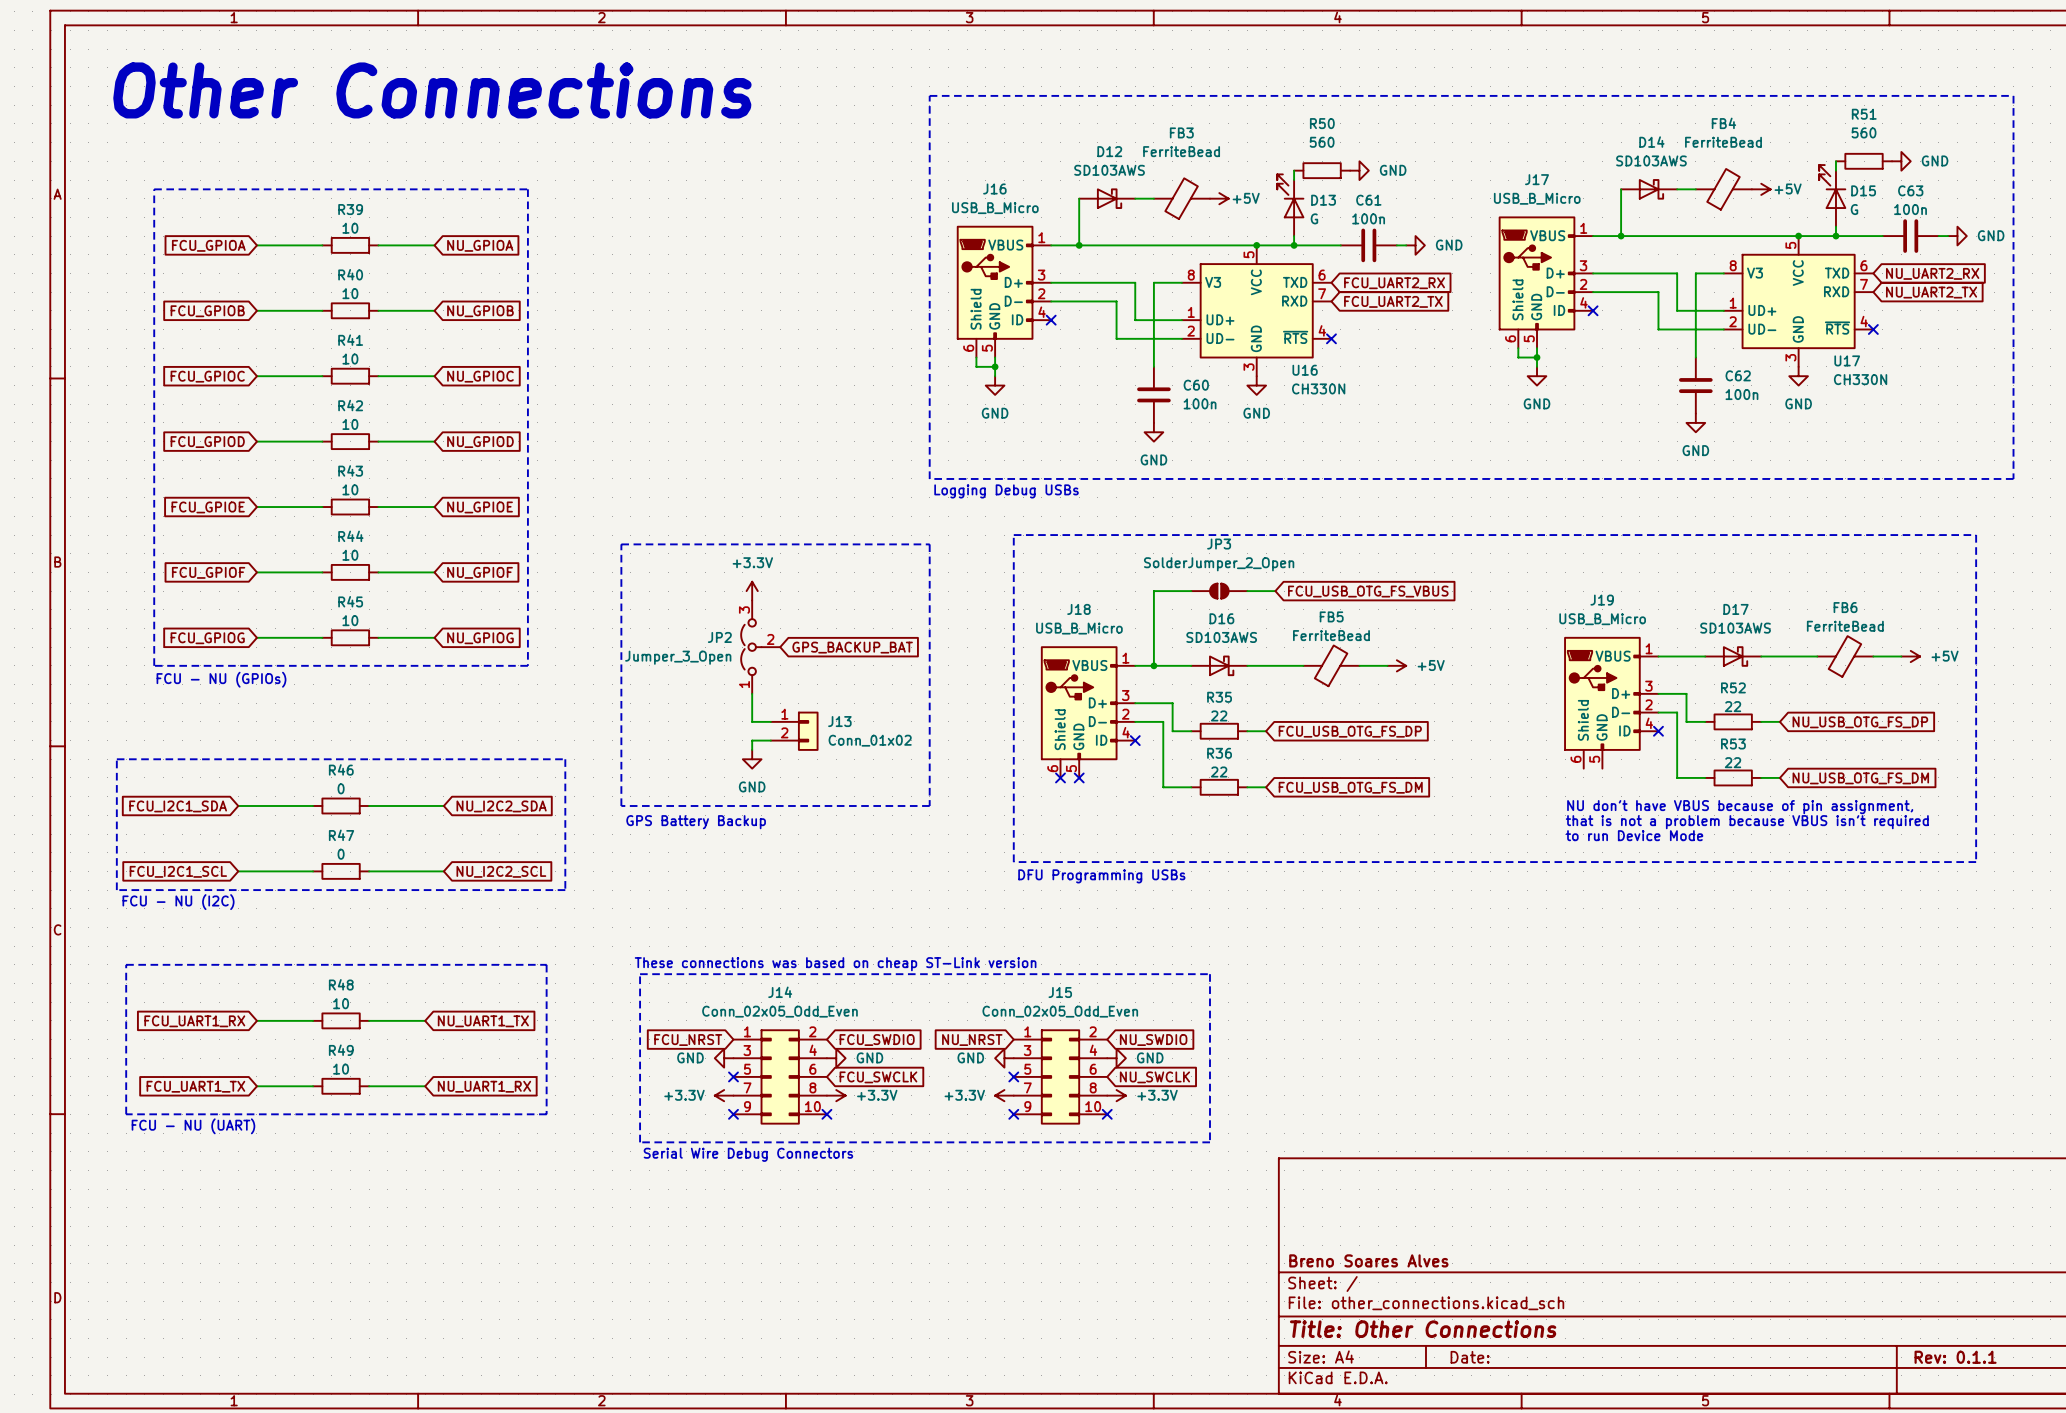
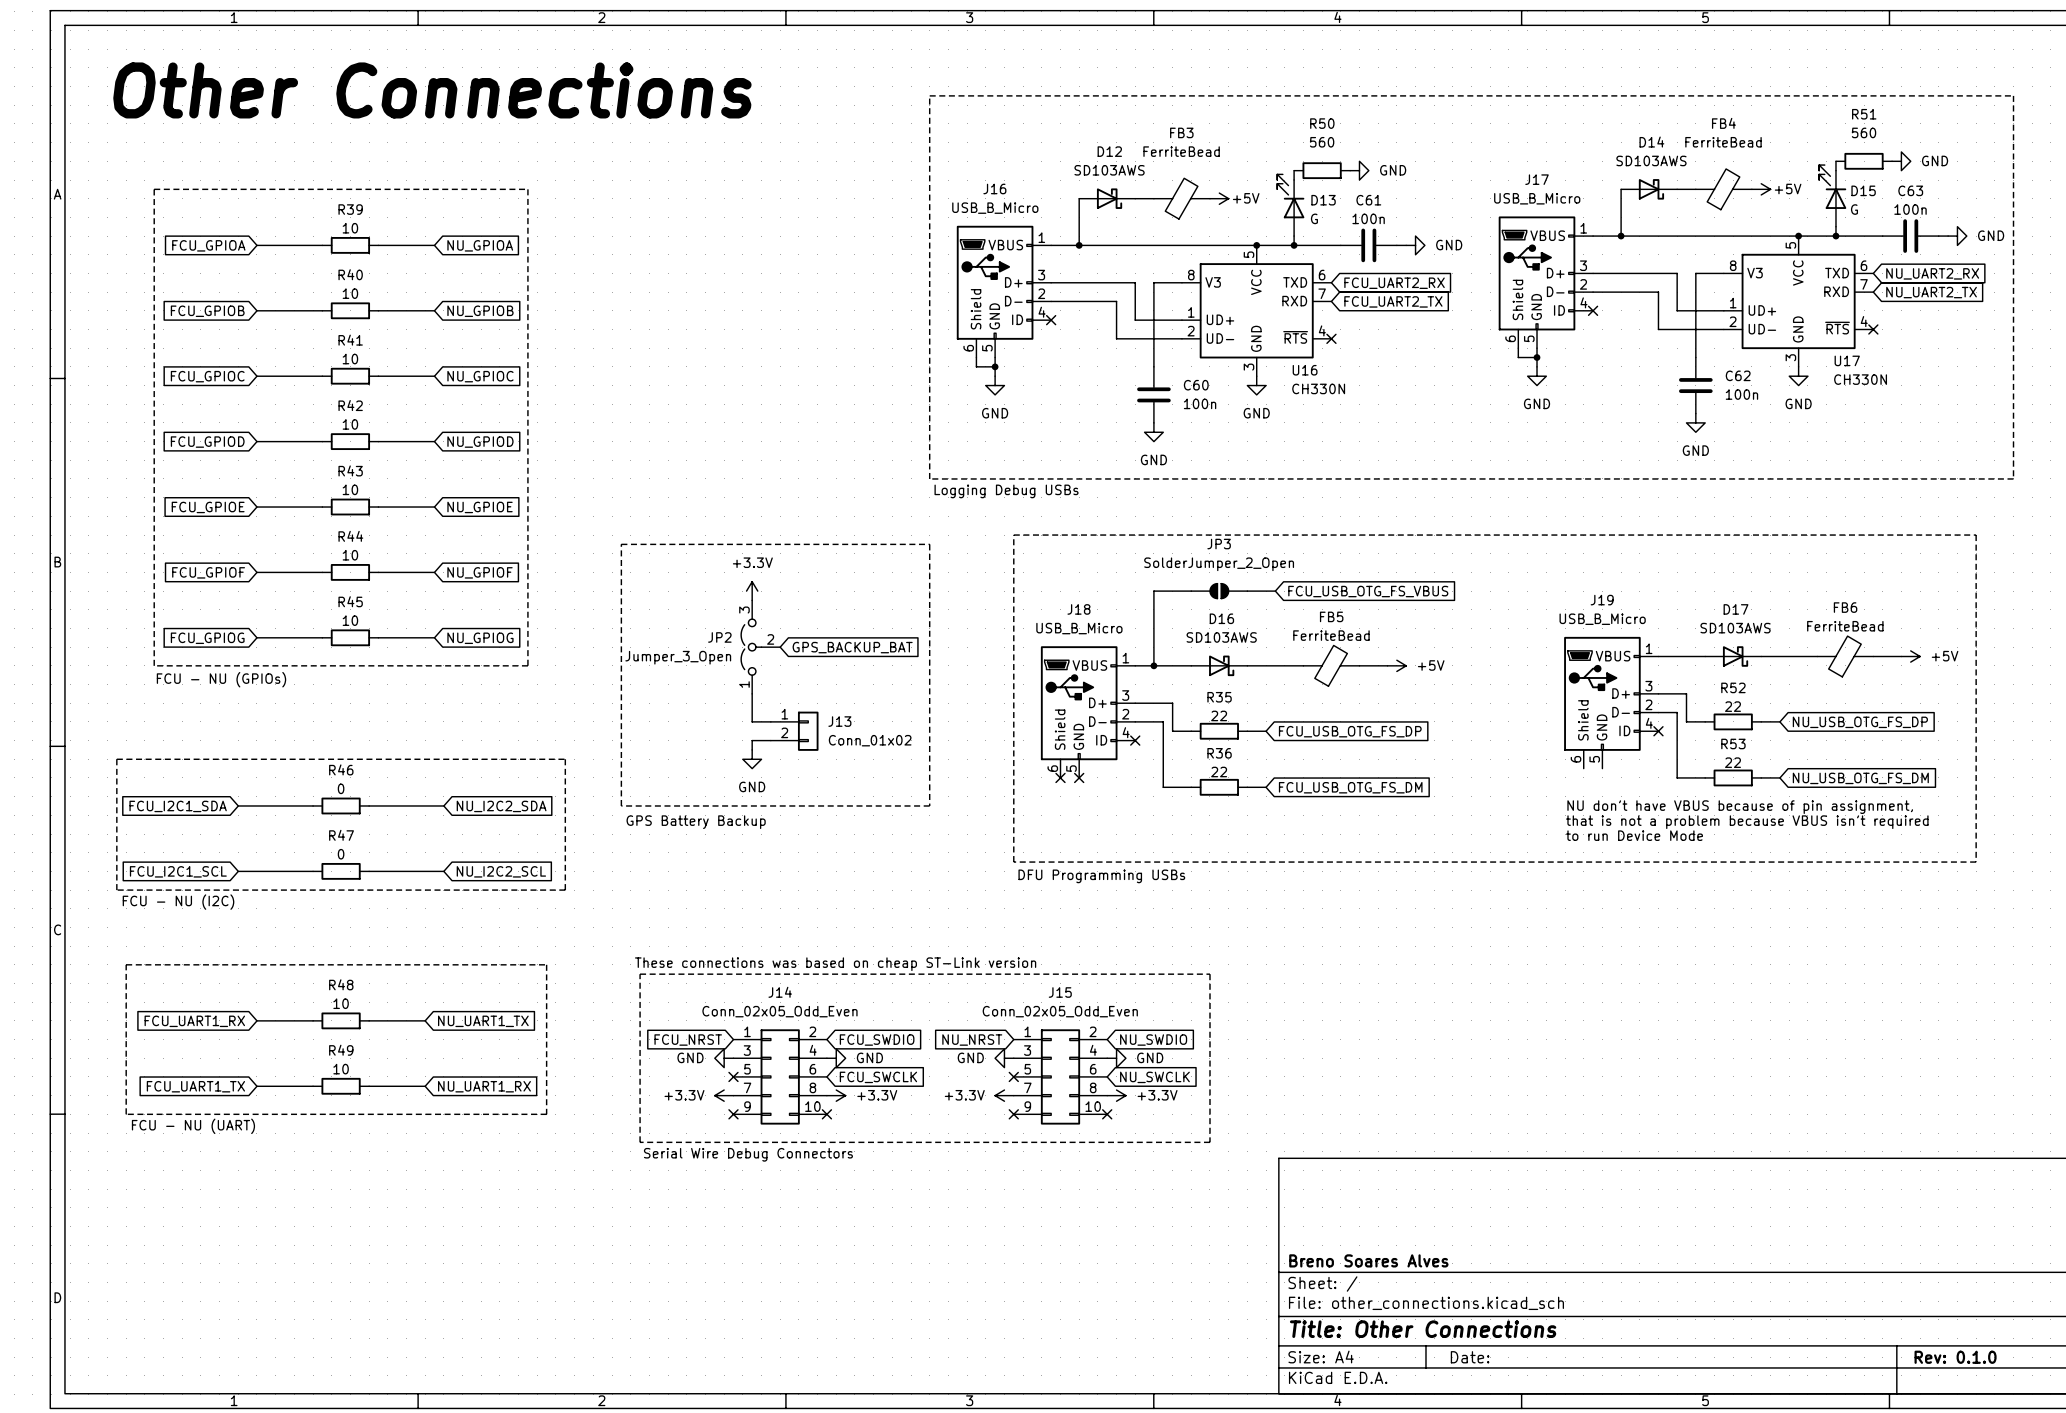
title block: Rev: 0.1.1 (1955, 1357) -> Rev: 0.1.0 (1955, 1357)

